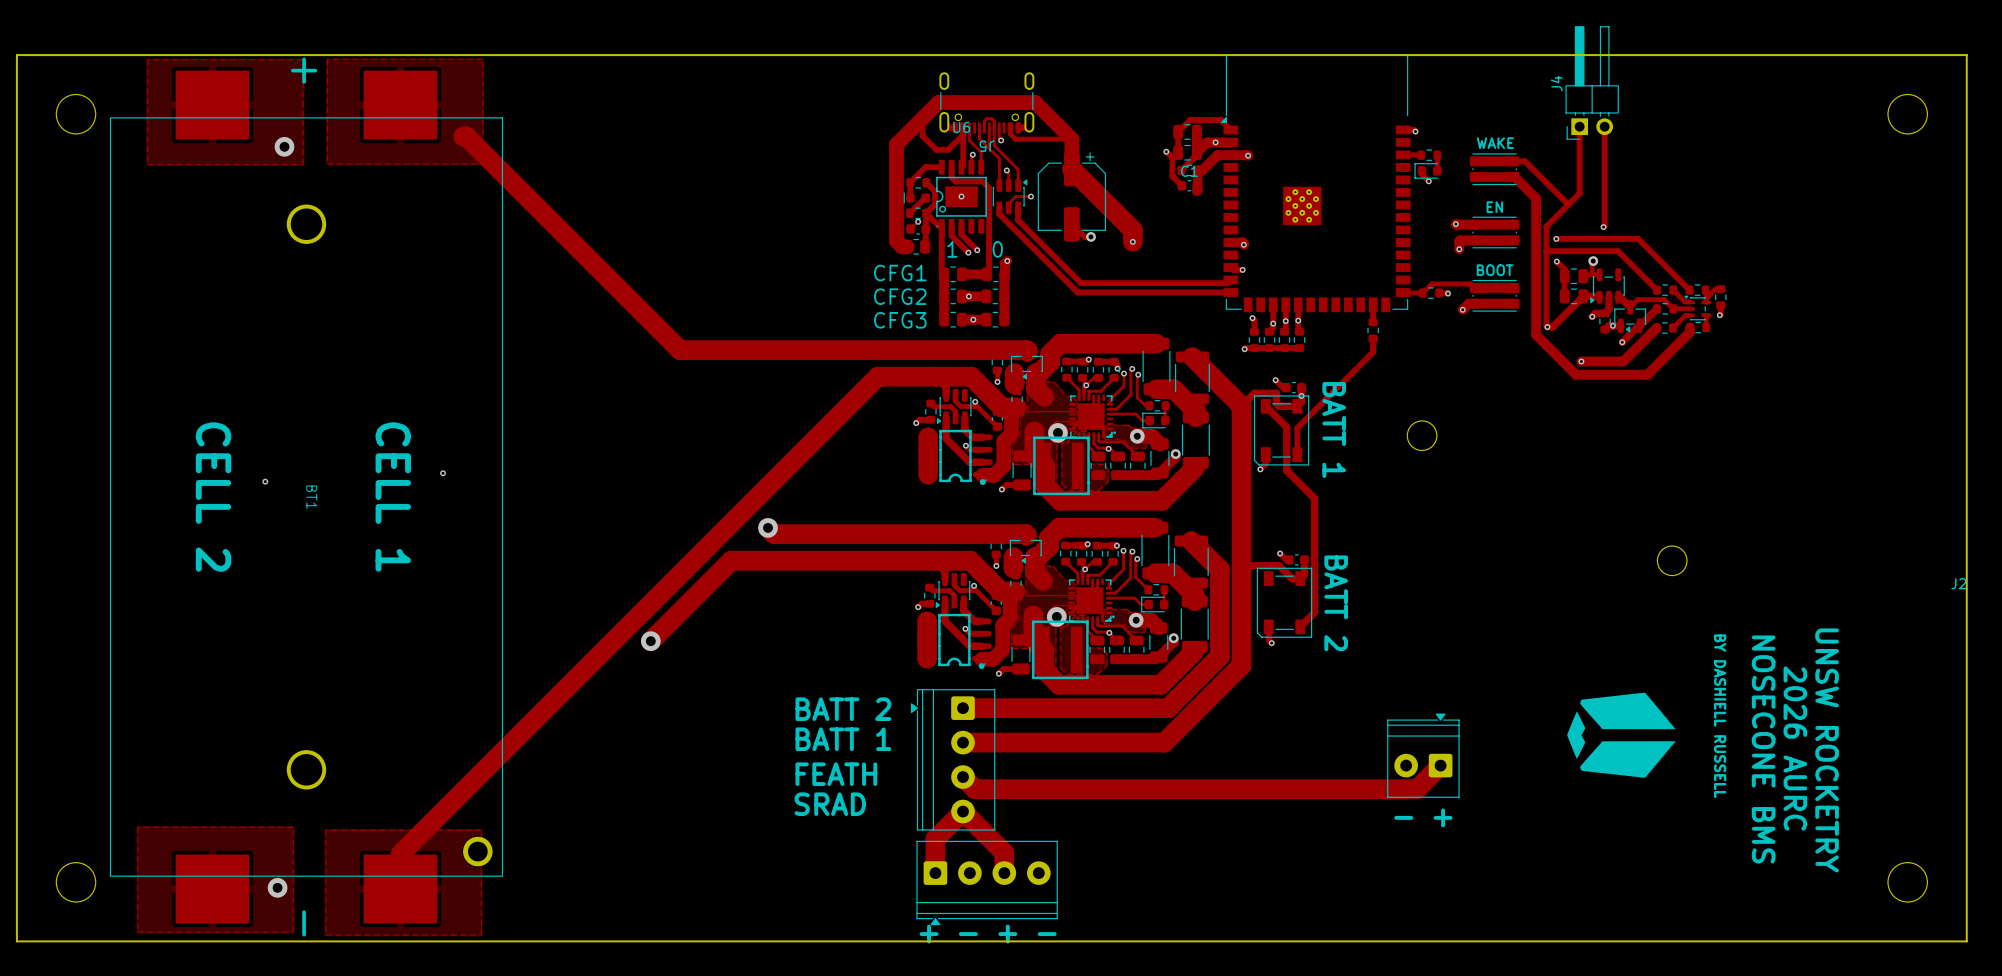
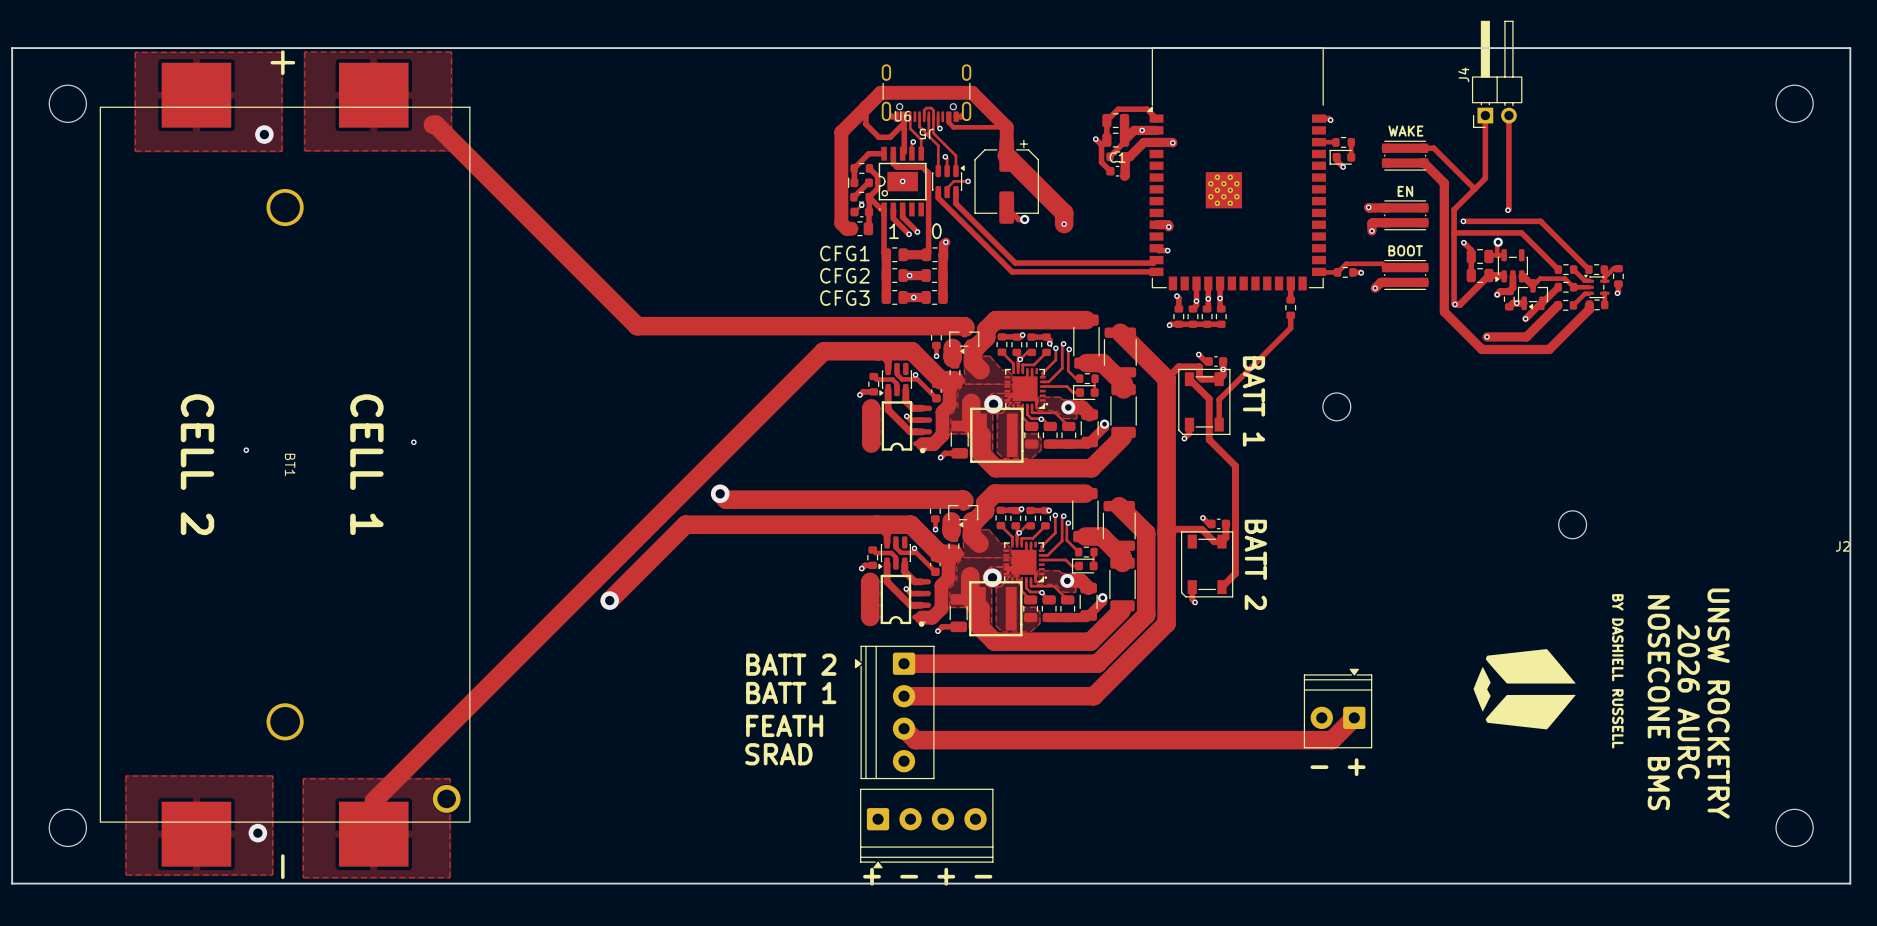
track: (935, 873) (935, 839) (962, 811) (1004, 852) (1004, 873) -> none

